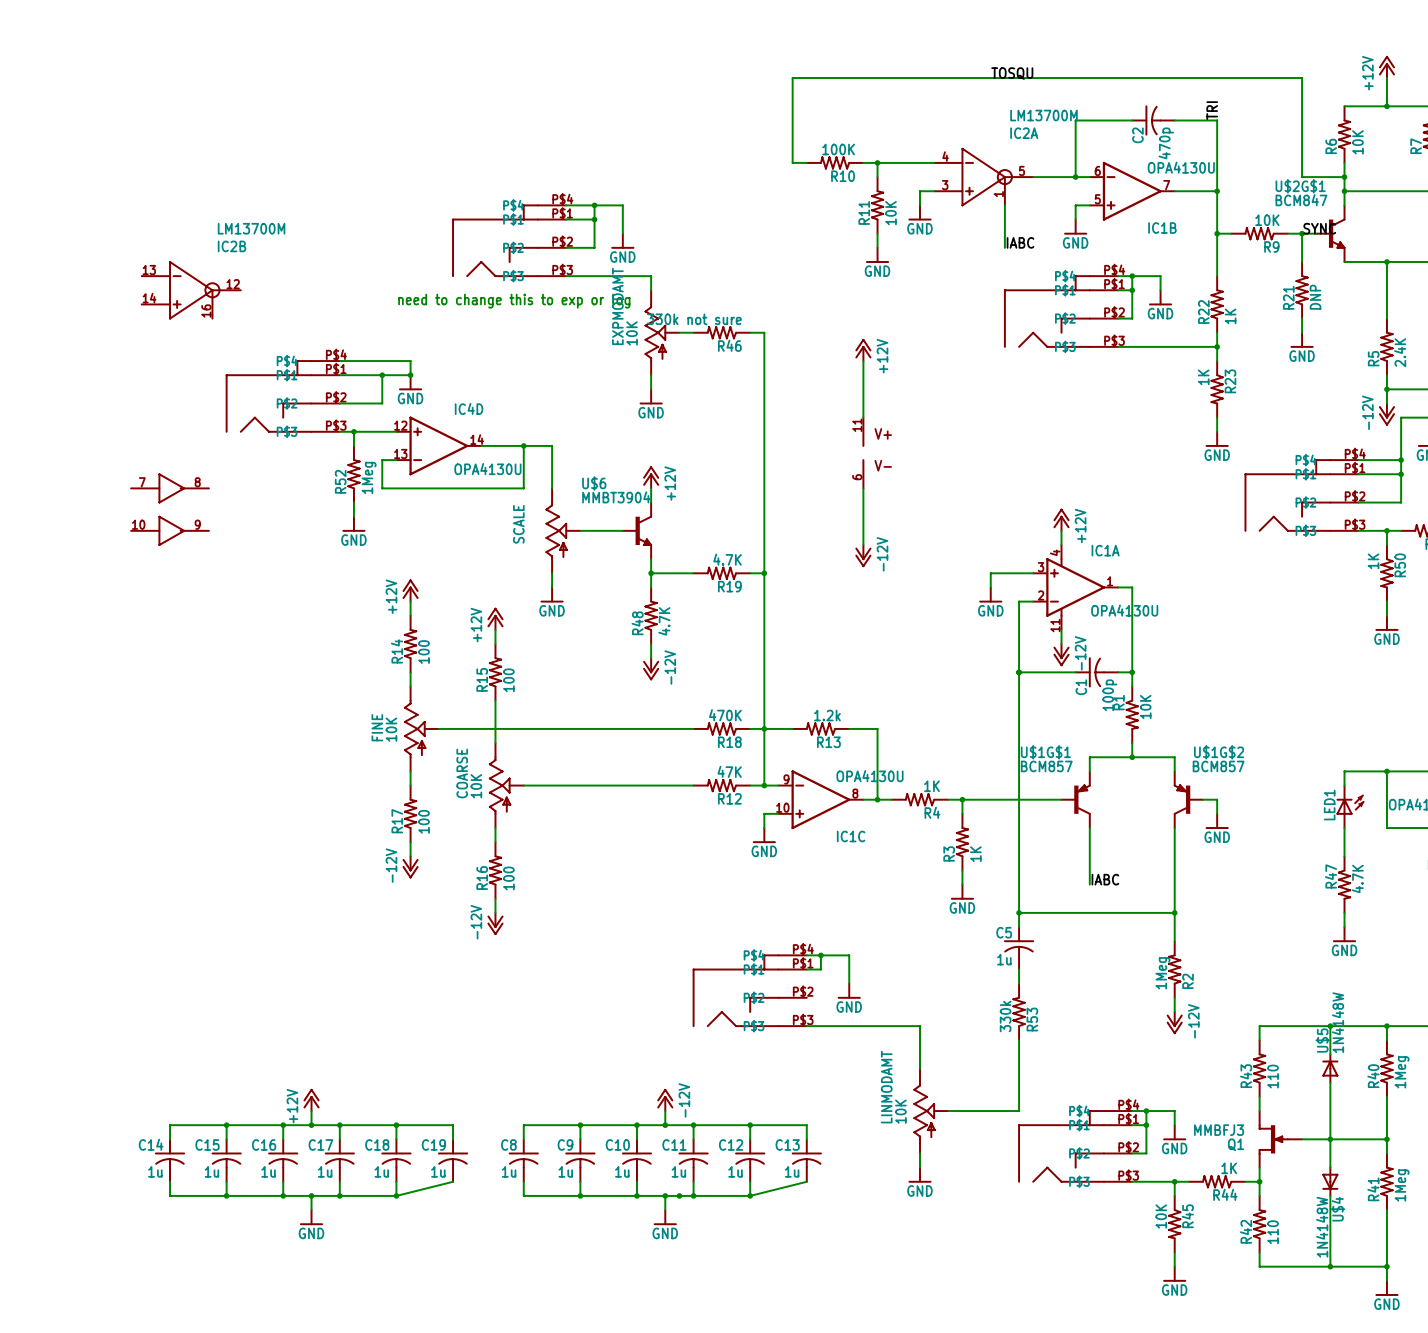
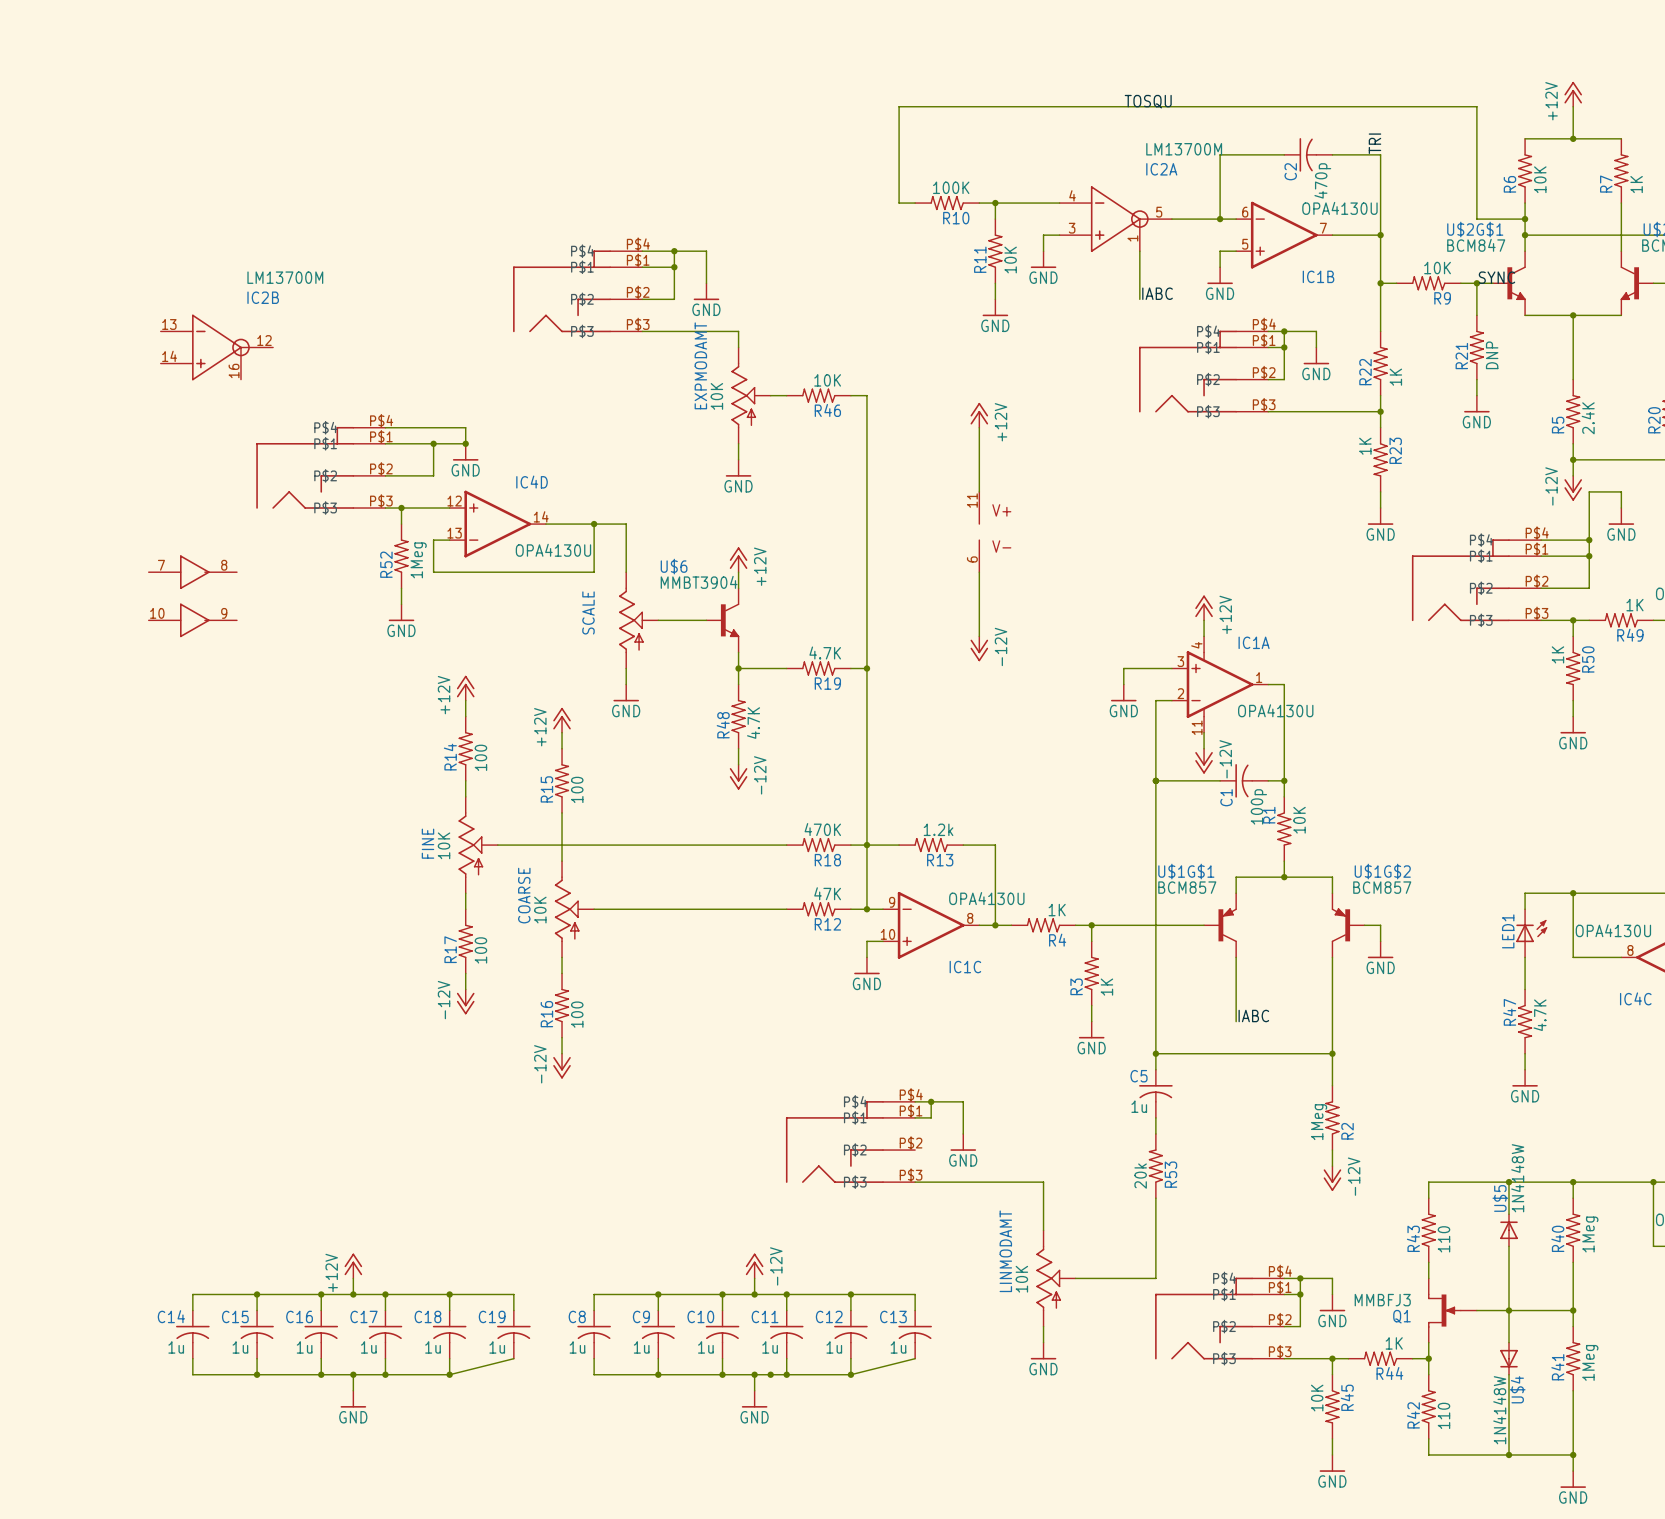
text: need to change this to exp or log (514, 301) -> none
R46 value: 330k not sure (694, 319) -> 10K (827, 380)
R53 value: 330k (1005, 1016) -> 20k (1140, 1176)

